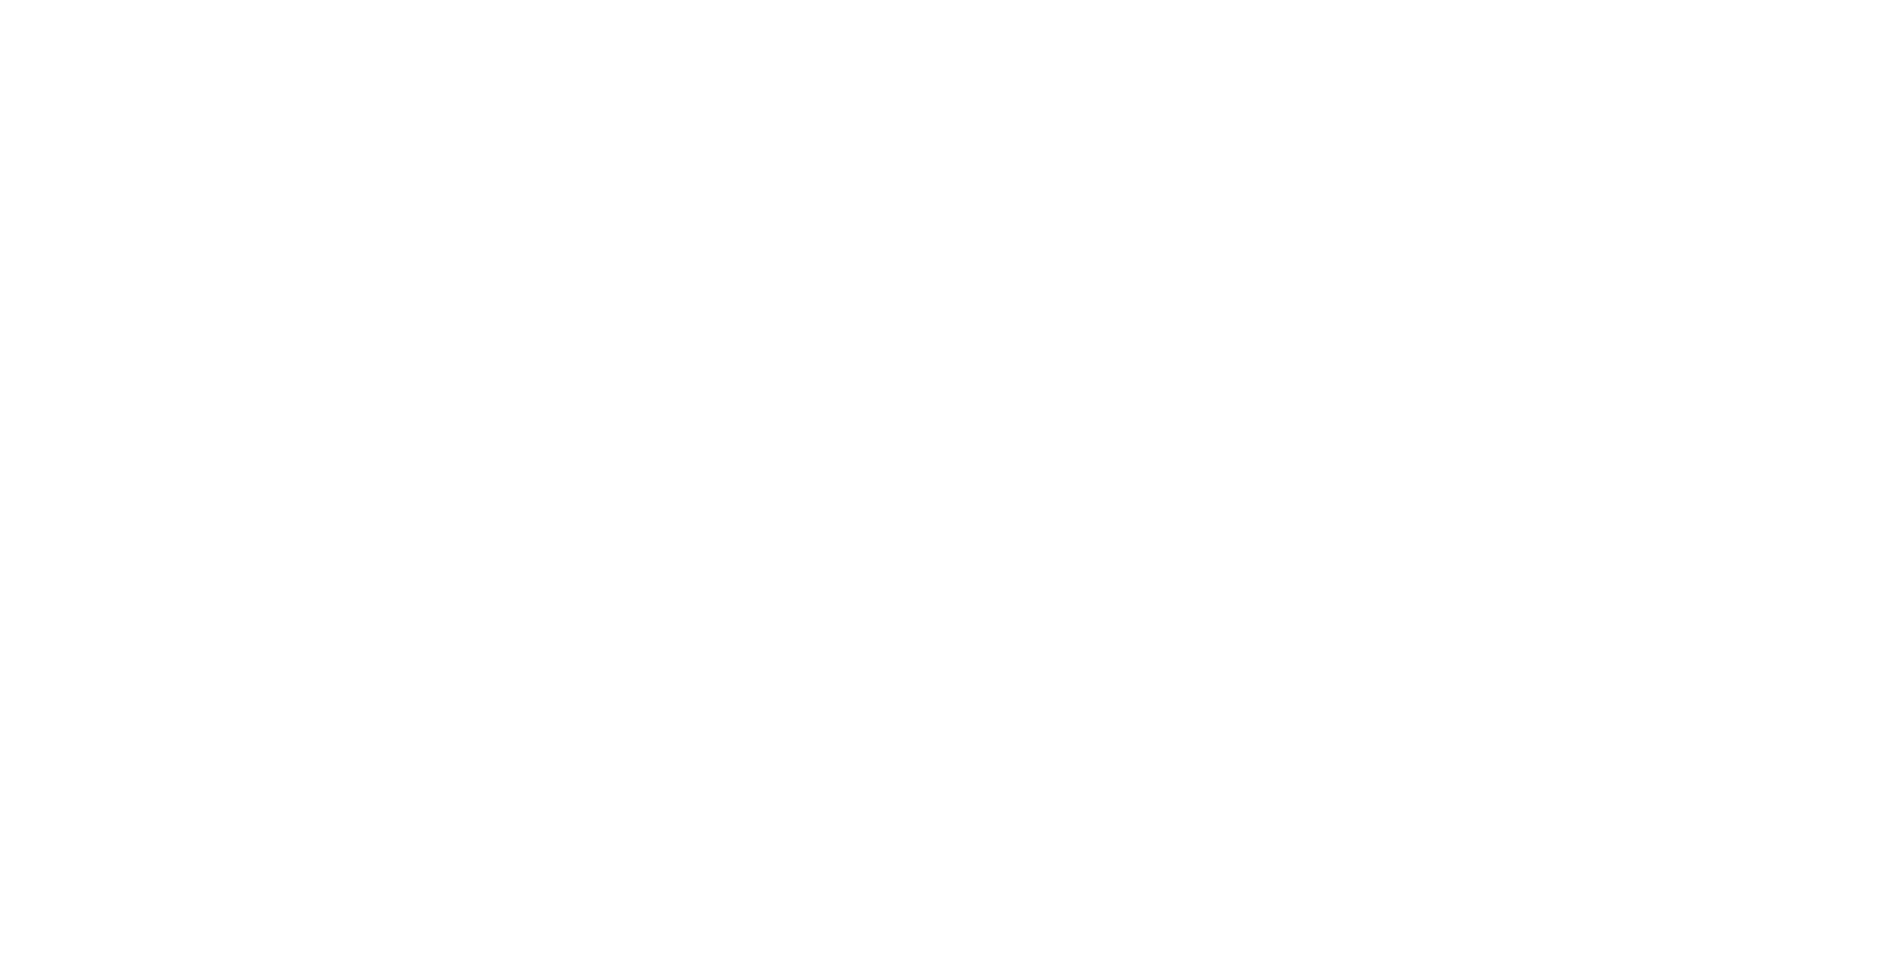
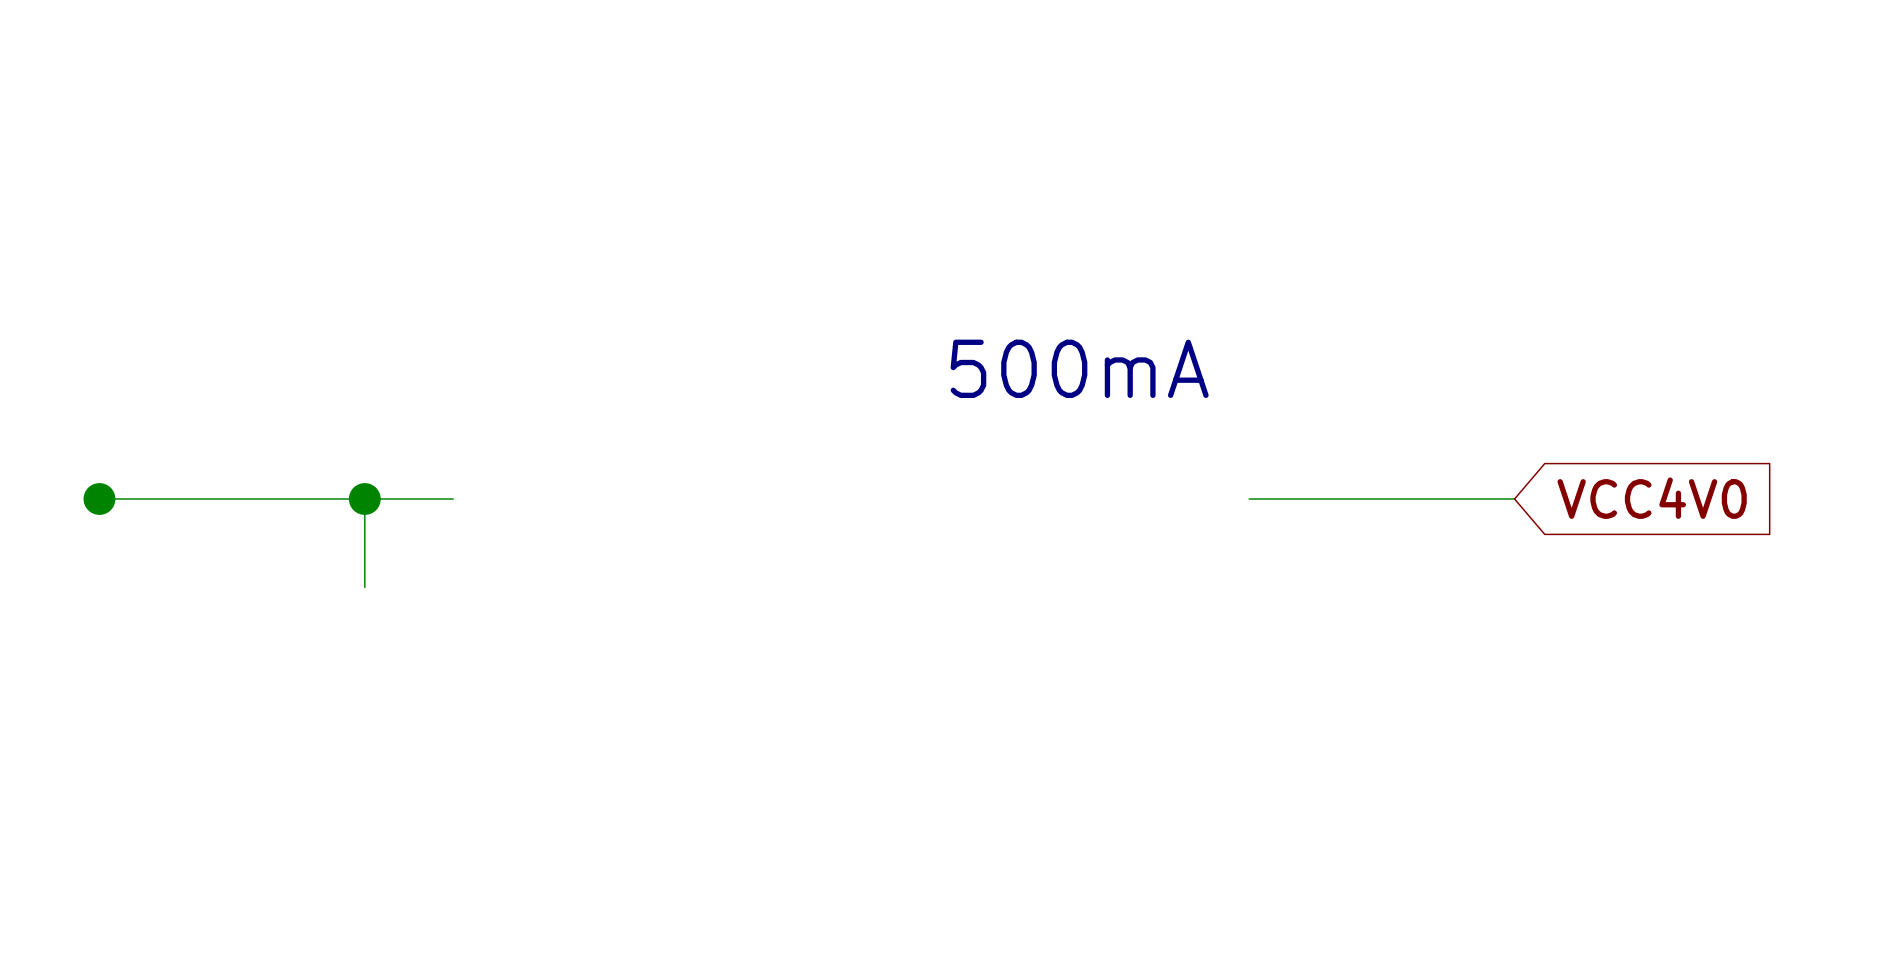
text: none -> 500mA (1079, 368)
global label: none -> VCC4V0 (1652, 498)
wire: none -> (99, 499) (453, 499)
junction: none -> (99, 499)
wire: none -> (364, 499) (364, 587)
junction: none -> (364, 499)
wire: none -> (1249, 499) (1514, 499)

